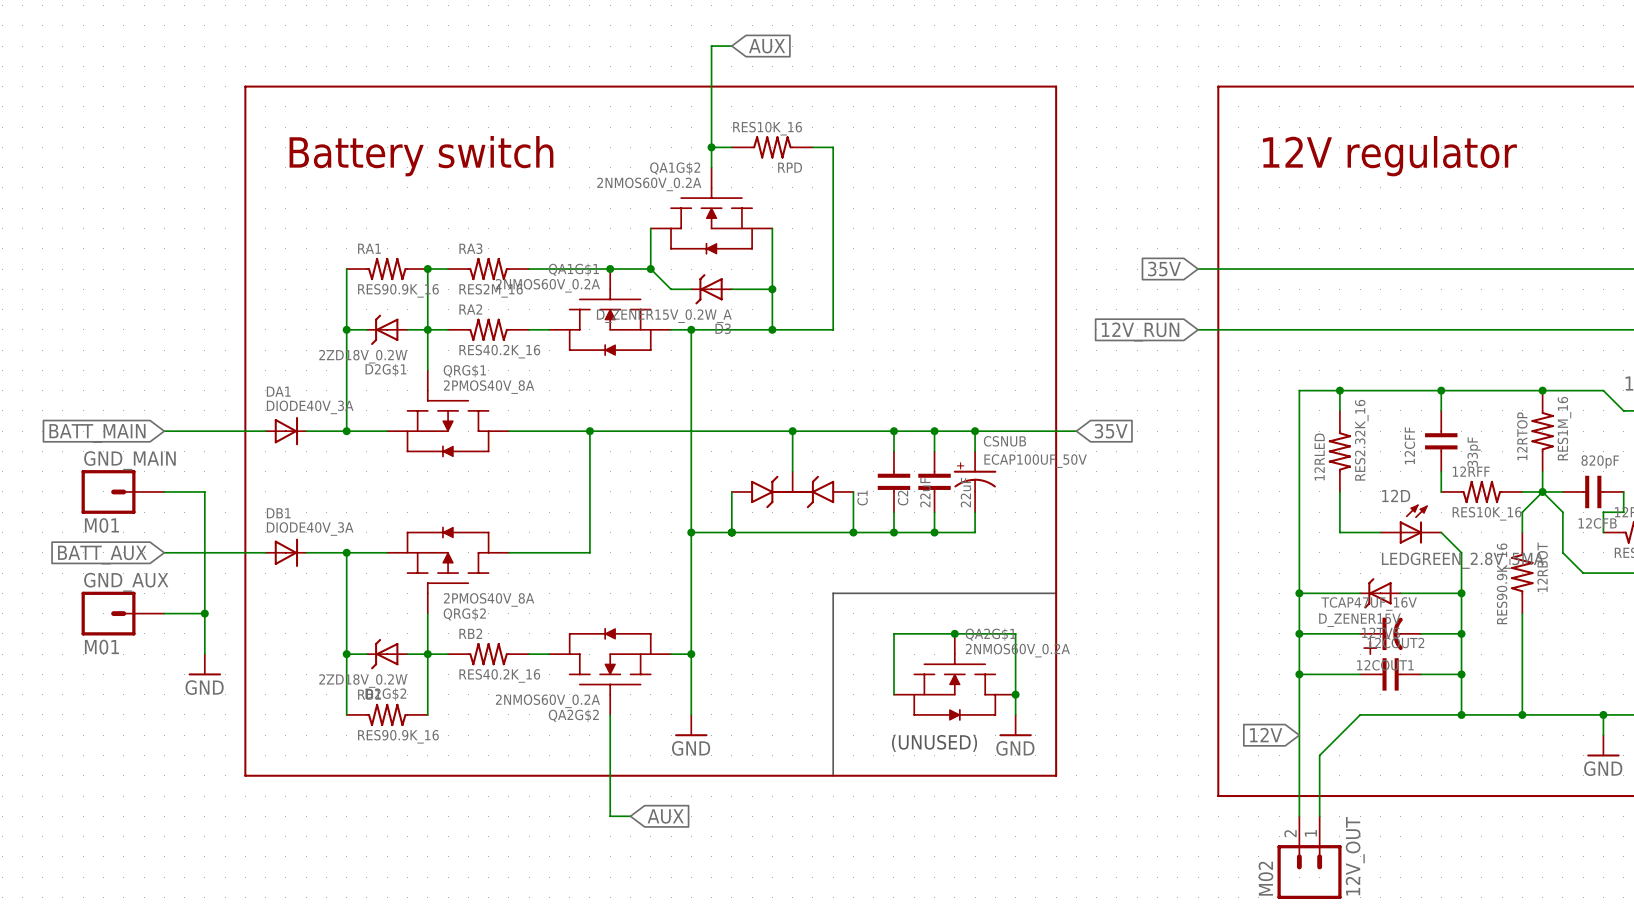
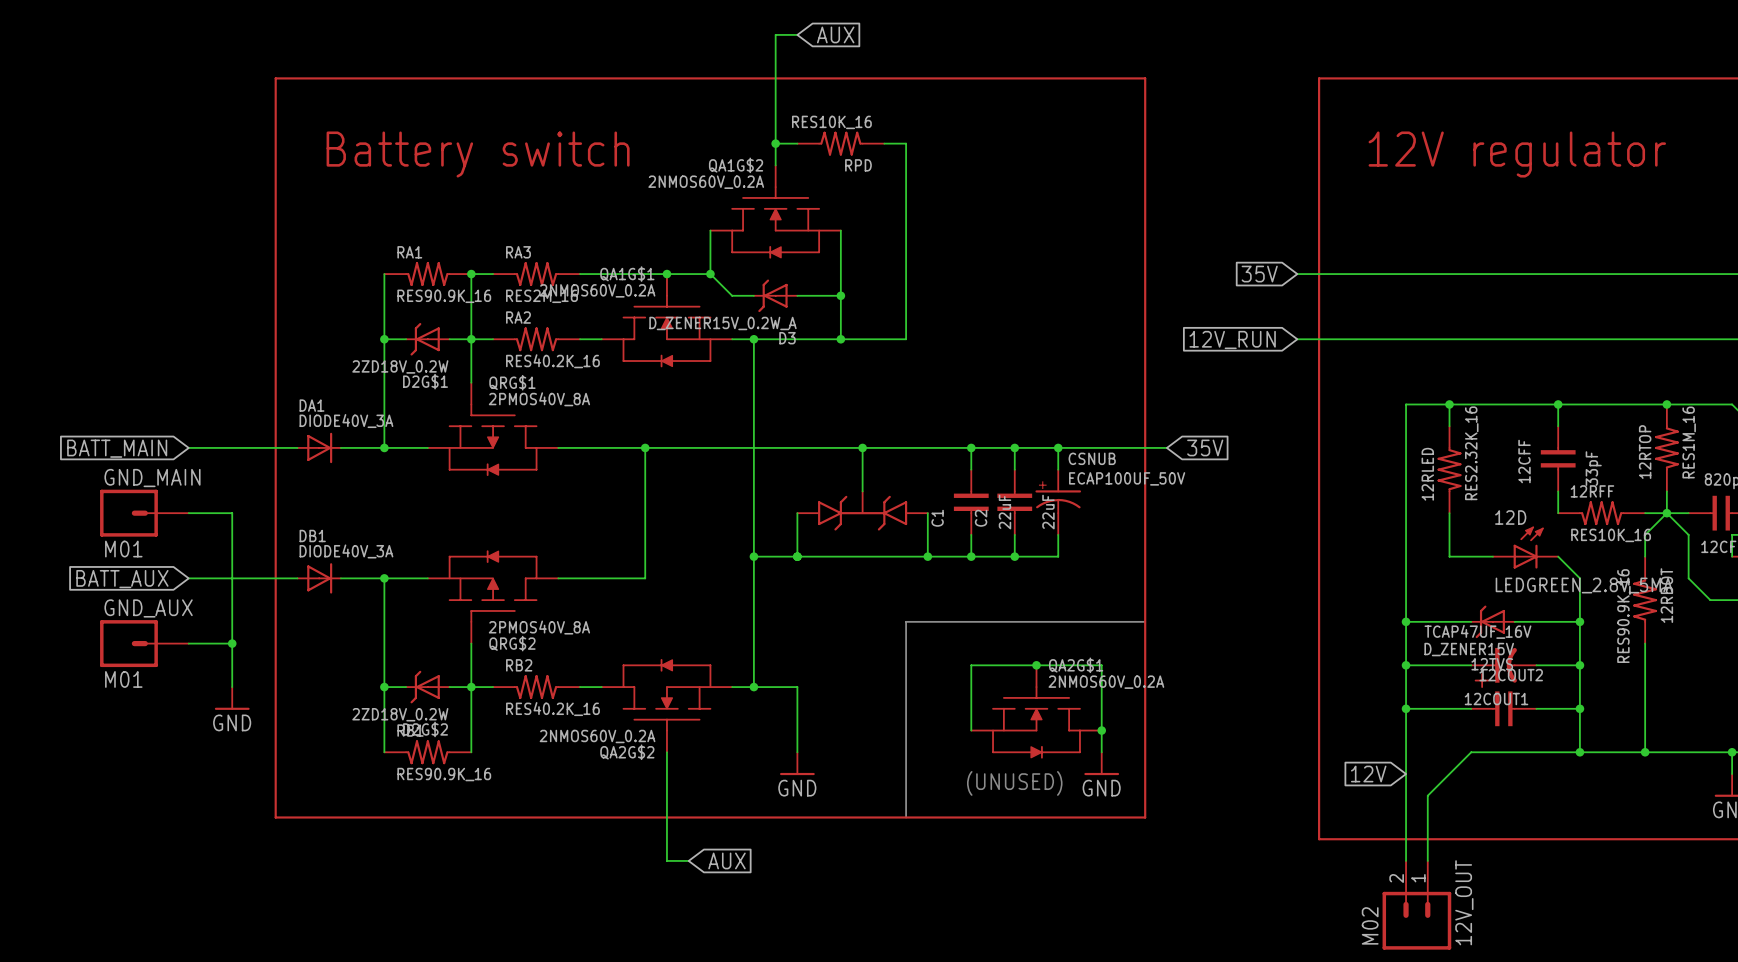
wire: (691, 654) (691, 714) -> (753, 687) (797, 687) (797, 752)
power symbol position: GND (691, 725) -> GND (797, 763)

